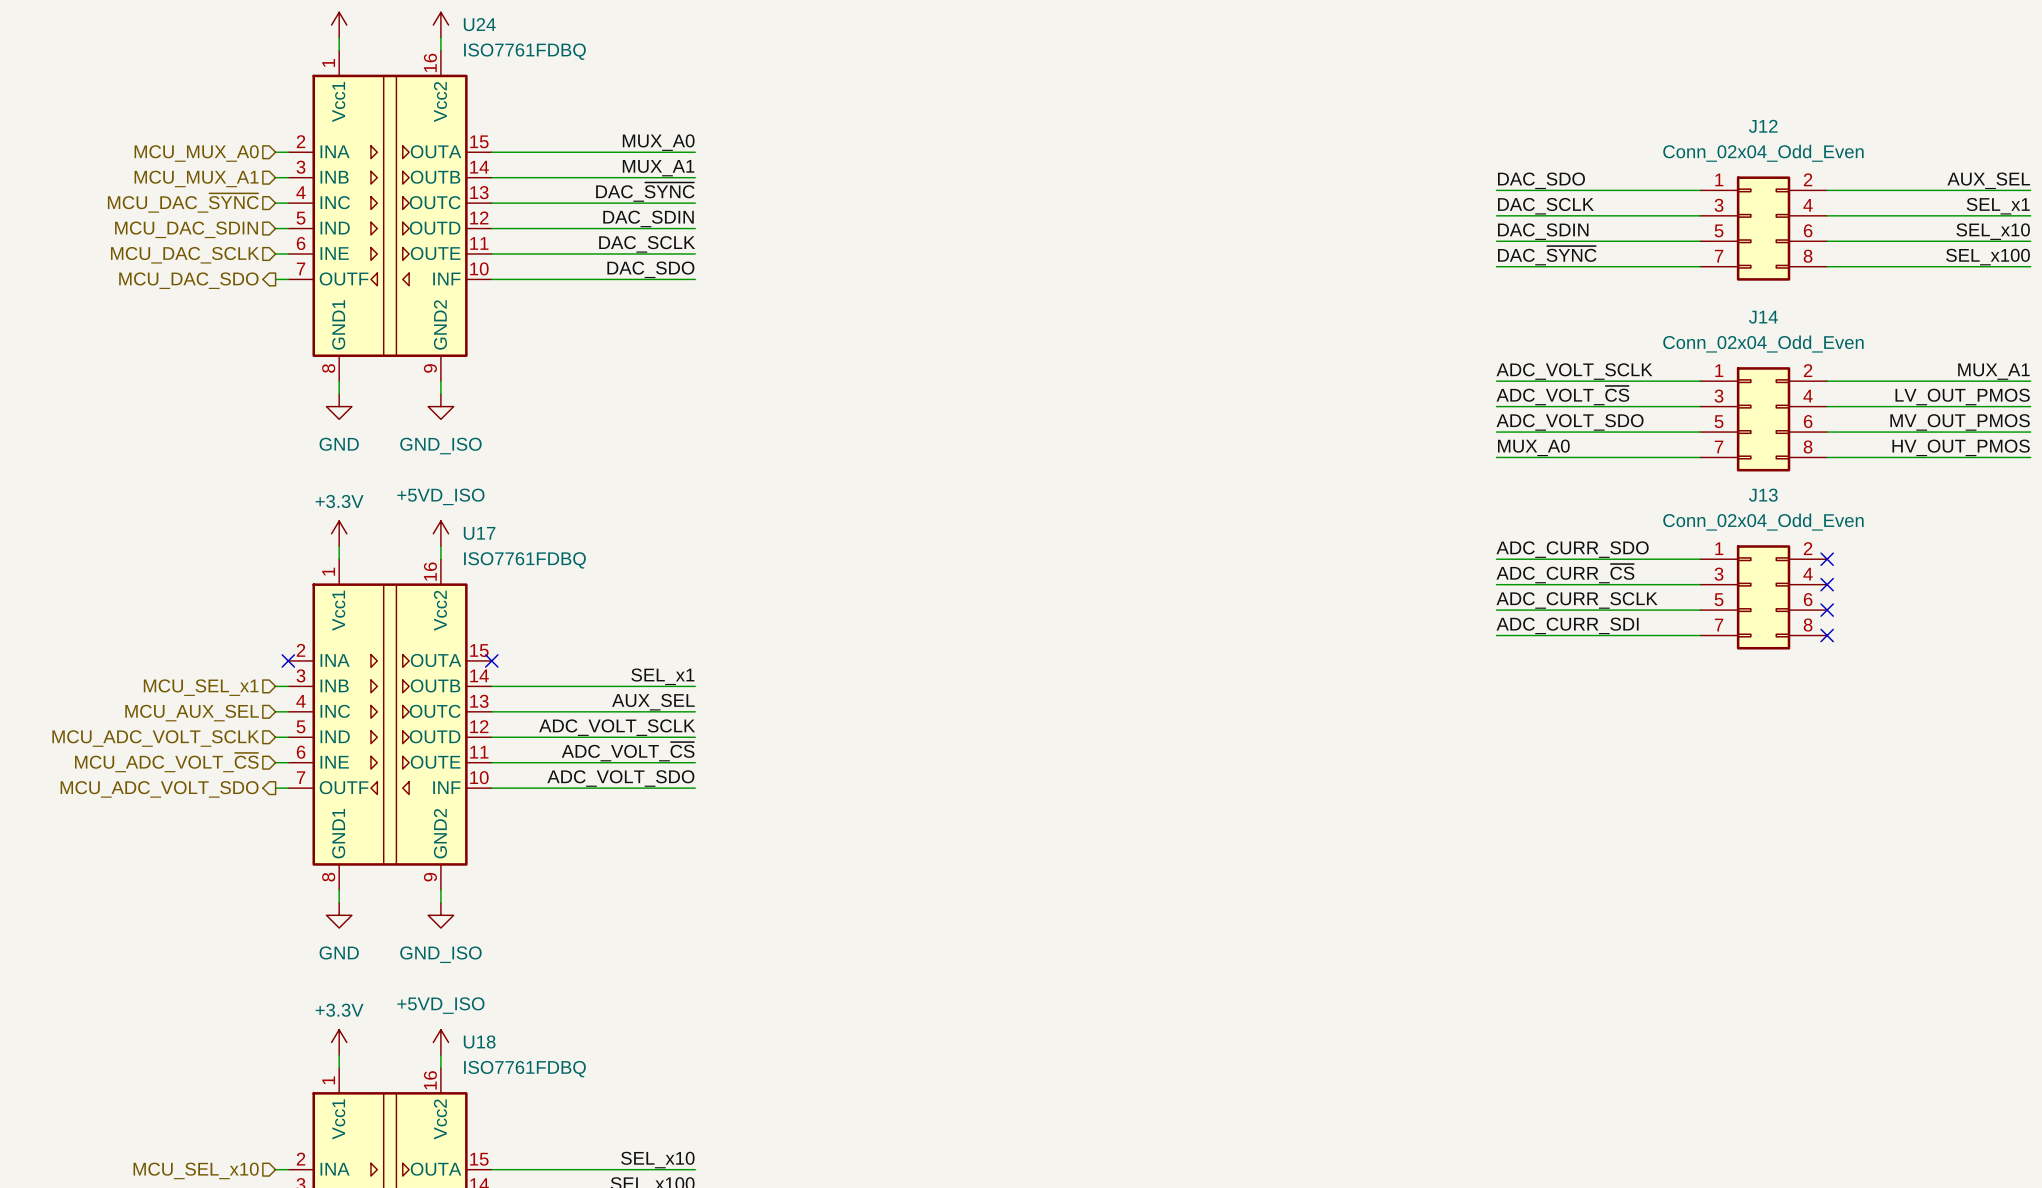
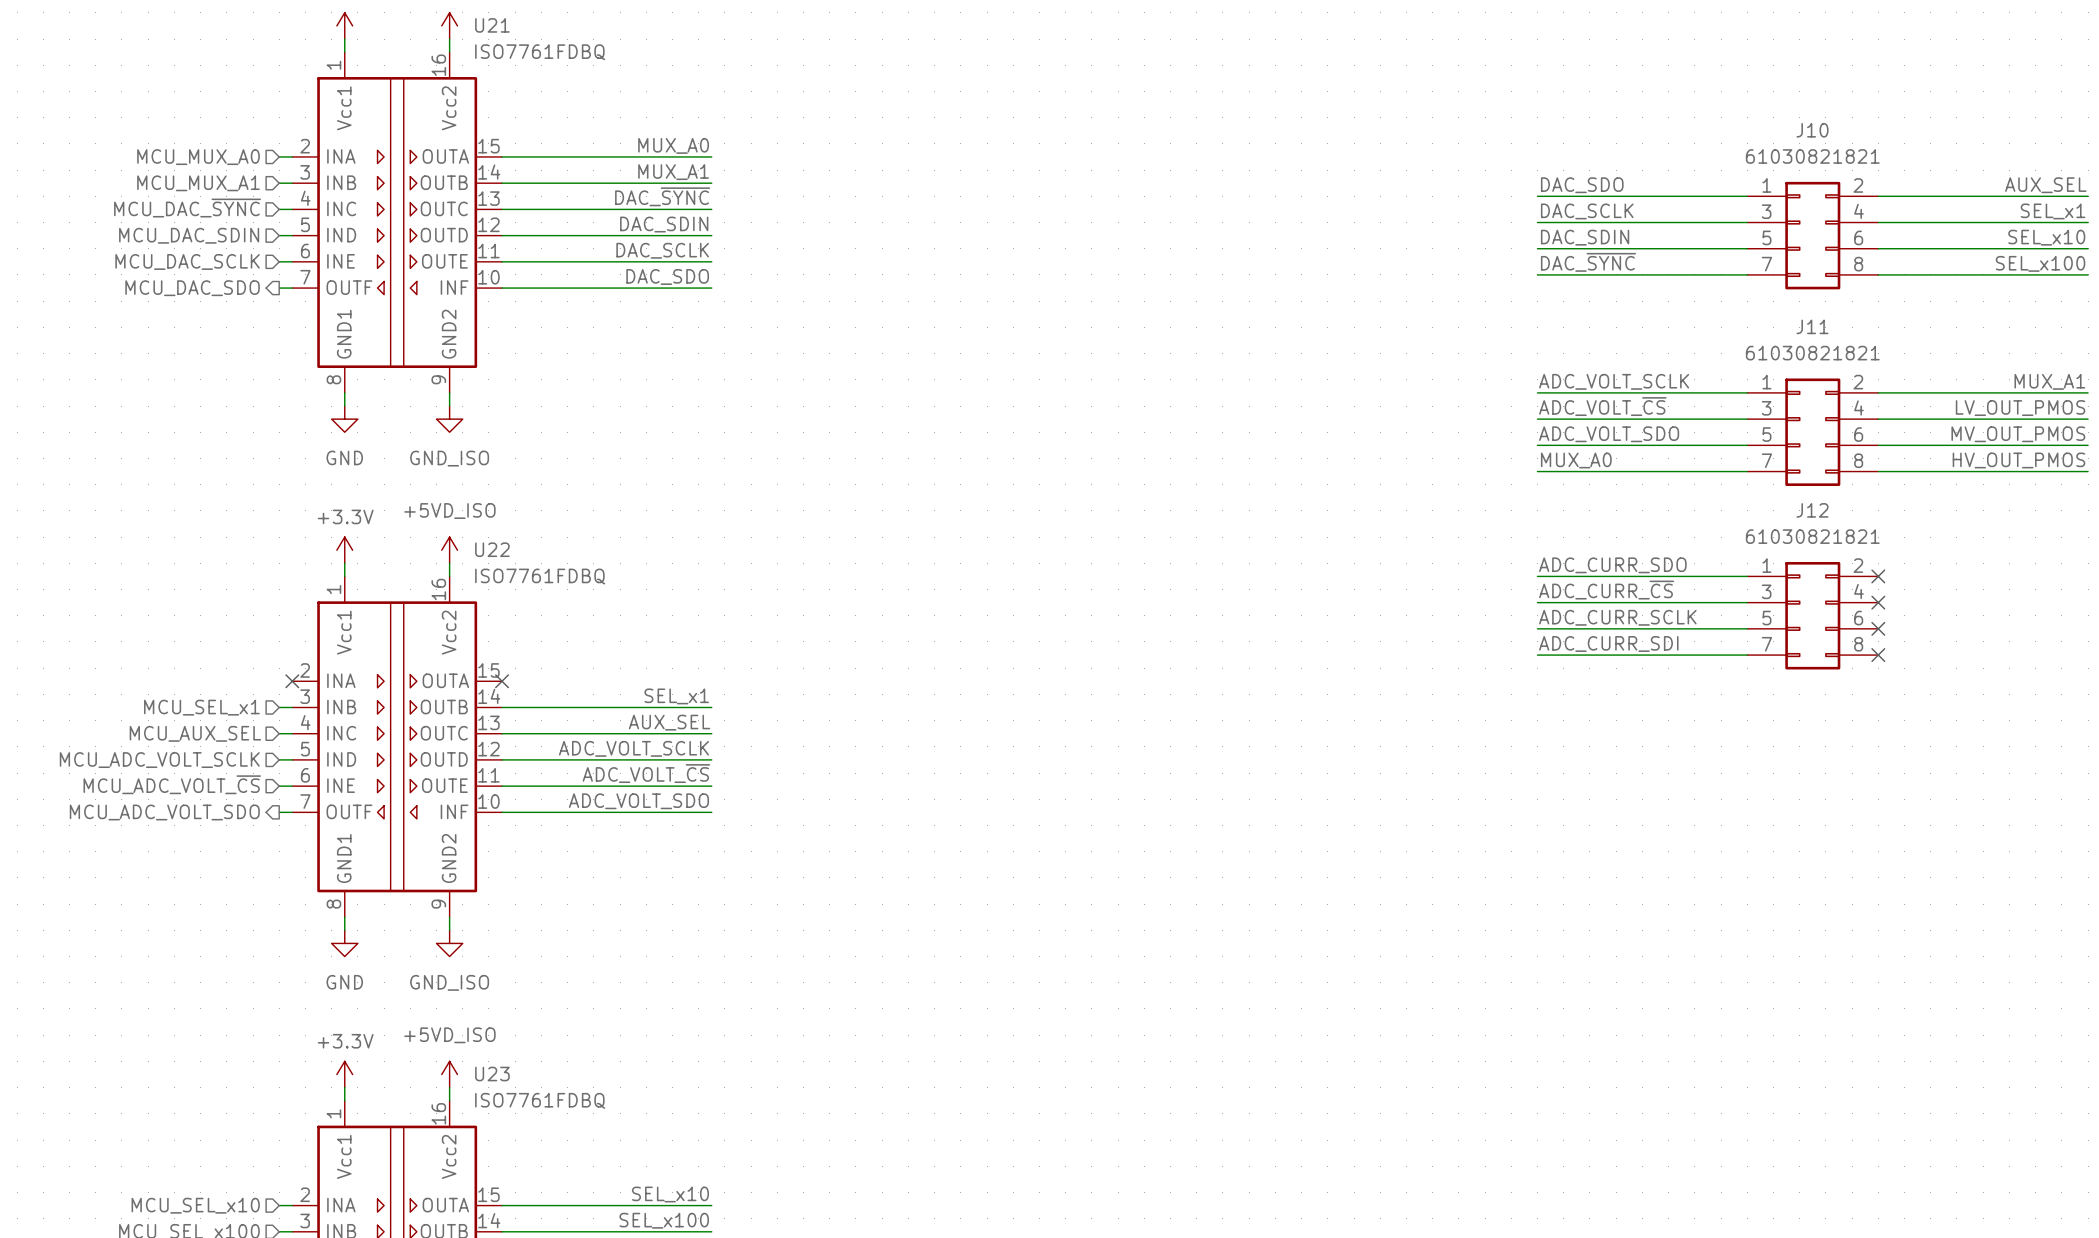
U24 name: U24 (479, 24) -> U21 (492, 25)
J12 name: J12 (1763, 126) -> J10 (1812, 130)
J12 value: Conn_02x04_Odd_Even (1763, 153) -> 61030821821 (1812, 156)
J14 name: J14 (1763, 317) -> J11 (1812, 326)
J14 value: Conn_02x04_Odd_Even (1763, 344) -> 61030821821 (1812, 353)
J13 name: J13 (1763, 495) -> J12 (1812, 510)
J13 value: Conn_02x04_Odd_Even (1763, 522) -> 61030821821 (1812, 536)
U17 name: U17 (479, 533) -> U22 (492, 549)
U18 name: U18 (479, 1042) -> U23 (492, 1074)

